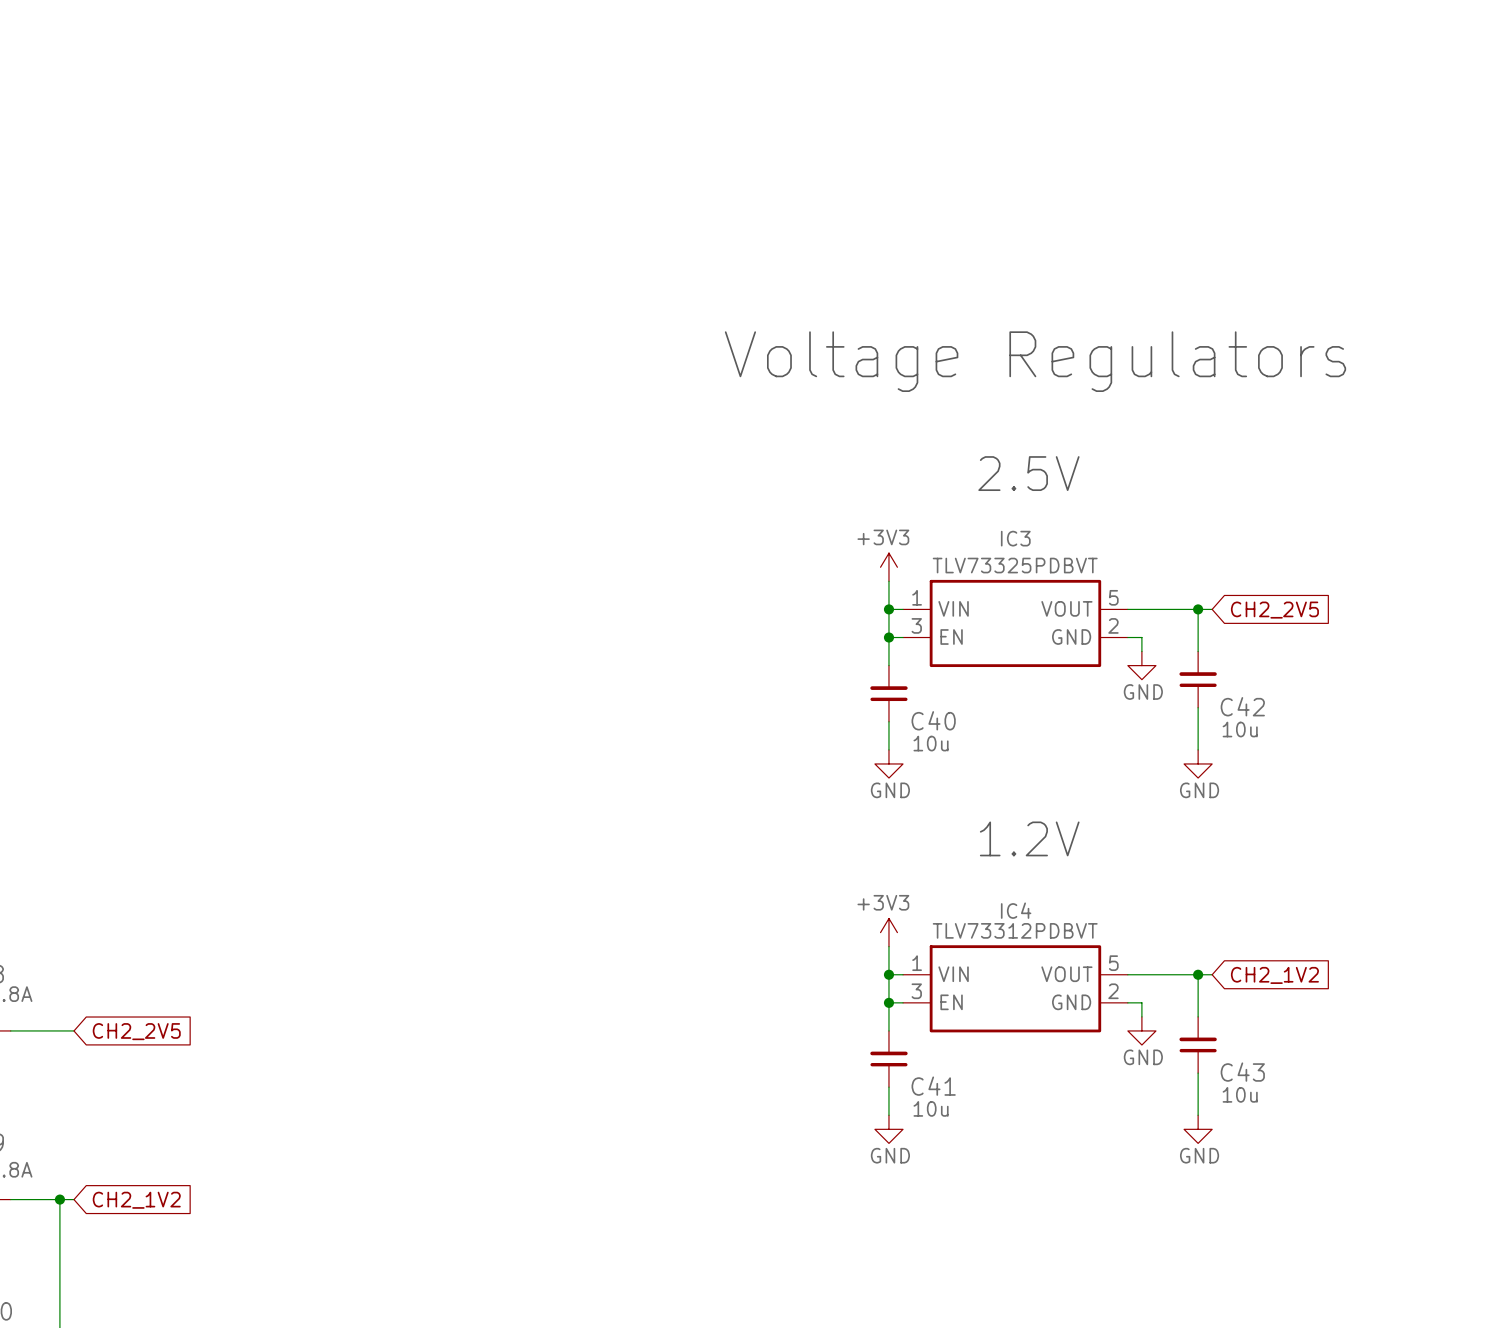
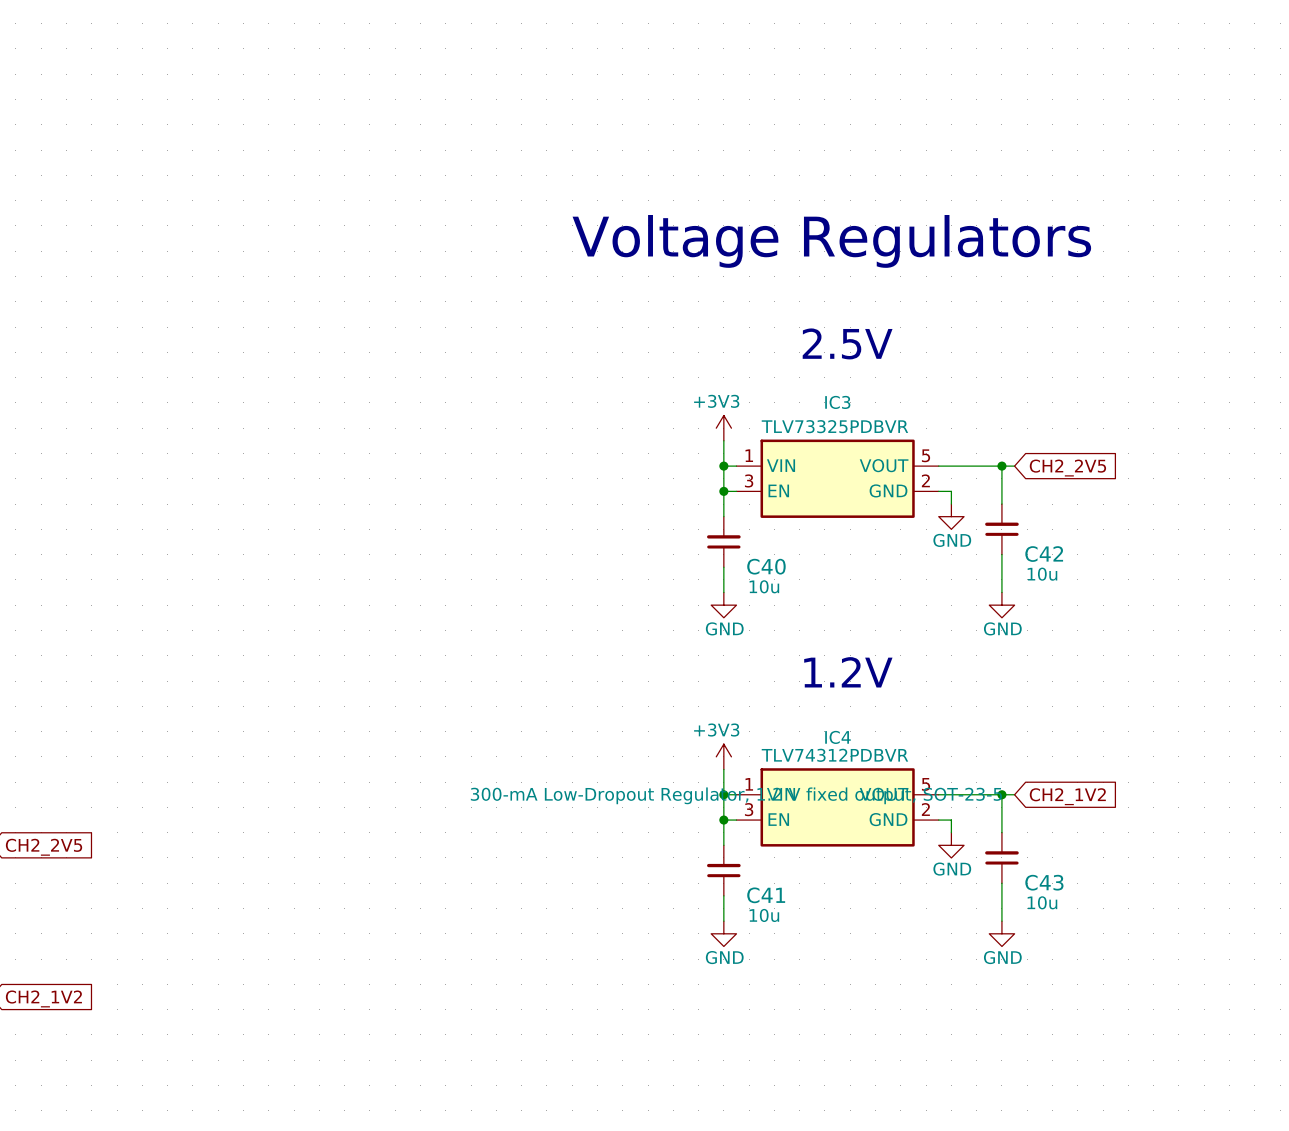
IC3 text: TLV73325PDBVT (1015, 565) -> TLV73325PDBVR (834, 426)
IC4 text: TLV73312PDBVT (1015, 930) -> TLV74312PDBVR (834, 755)
IC4 text: none -> 300-mA Low-Dropout Regulator, 1.2 V fixed output, SOT-23-5 (736, 795)

